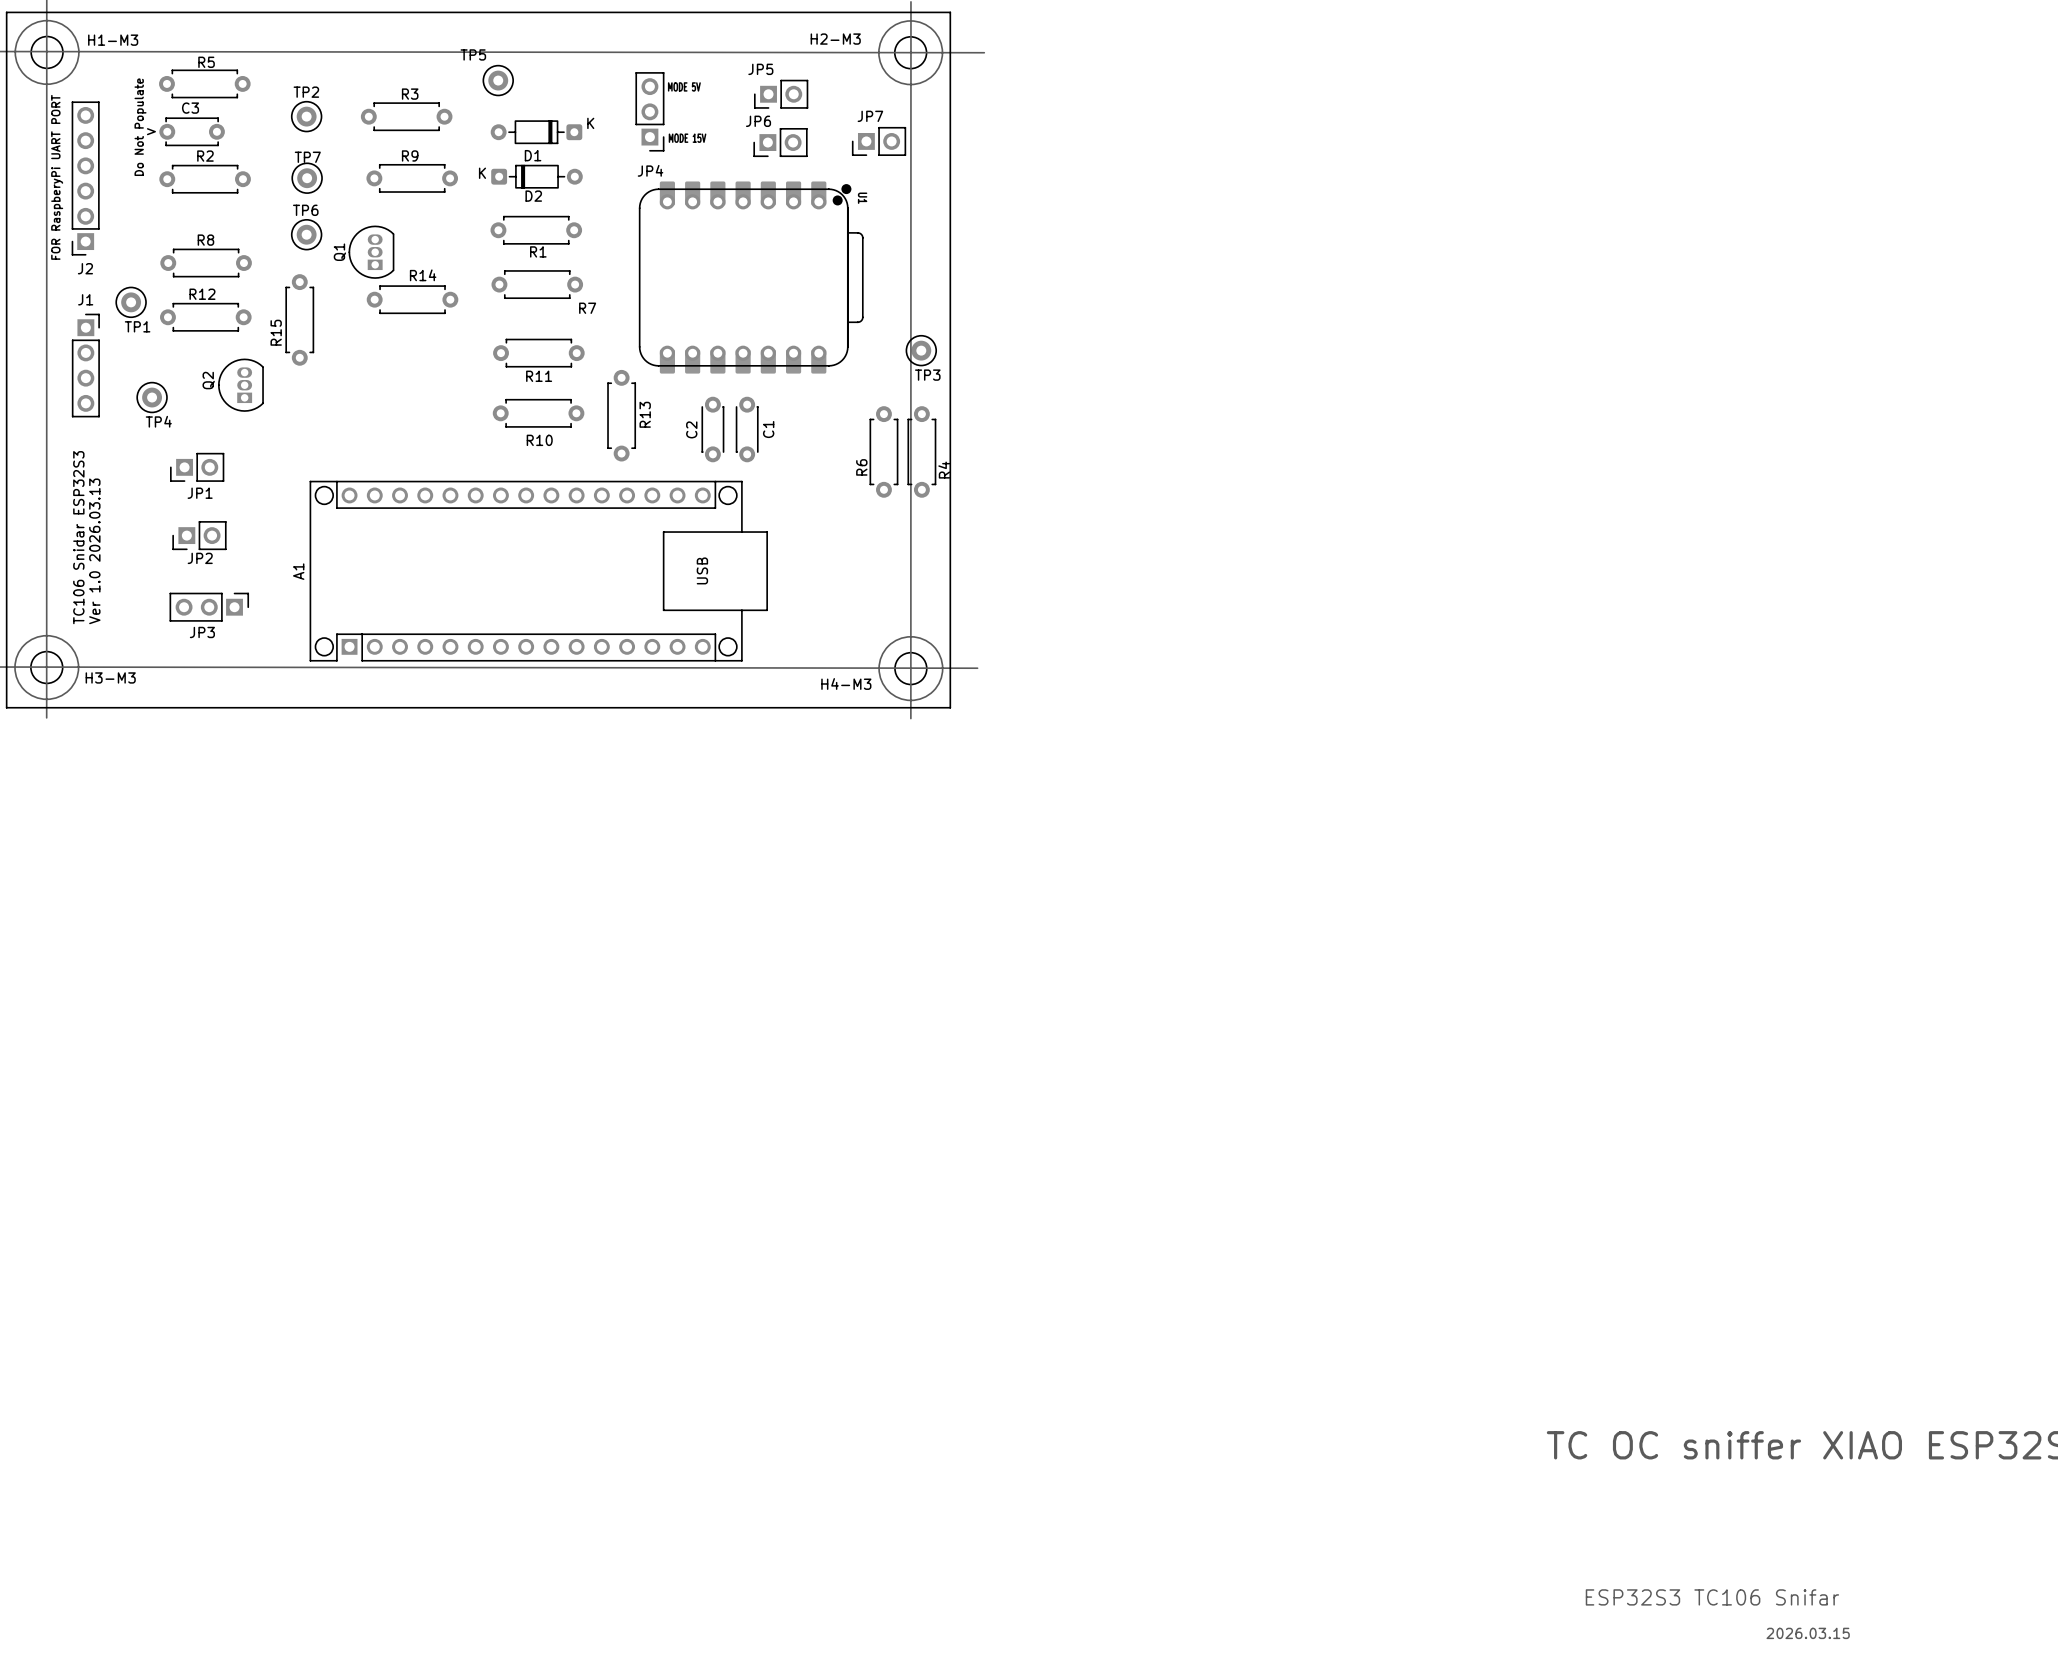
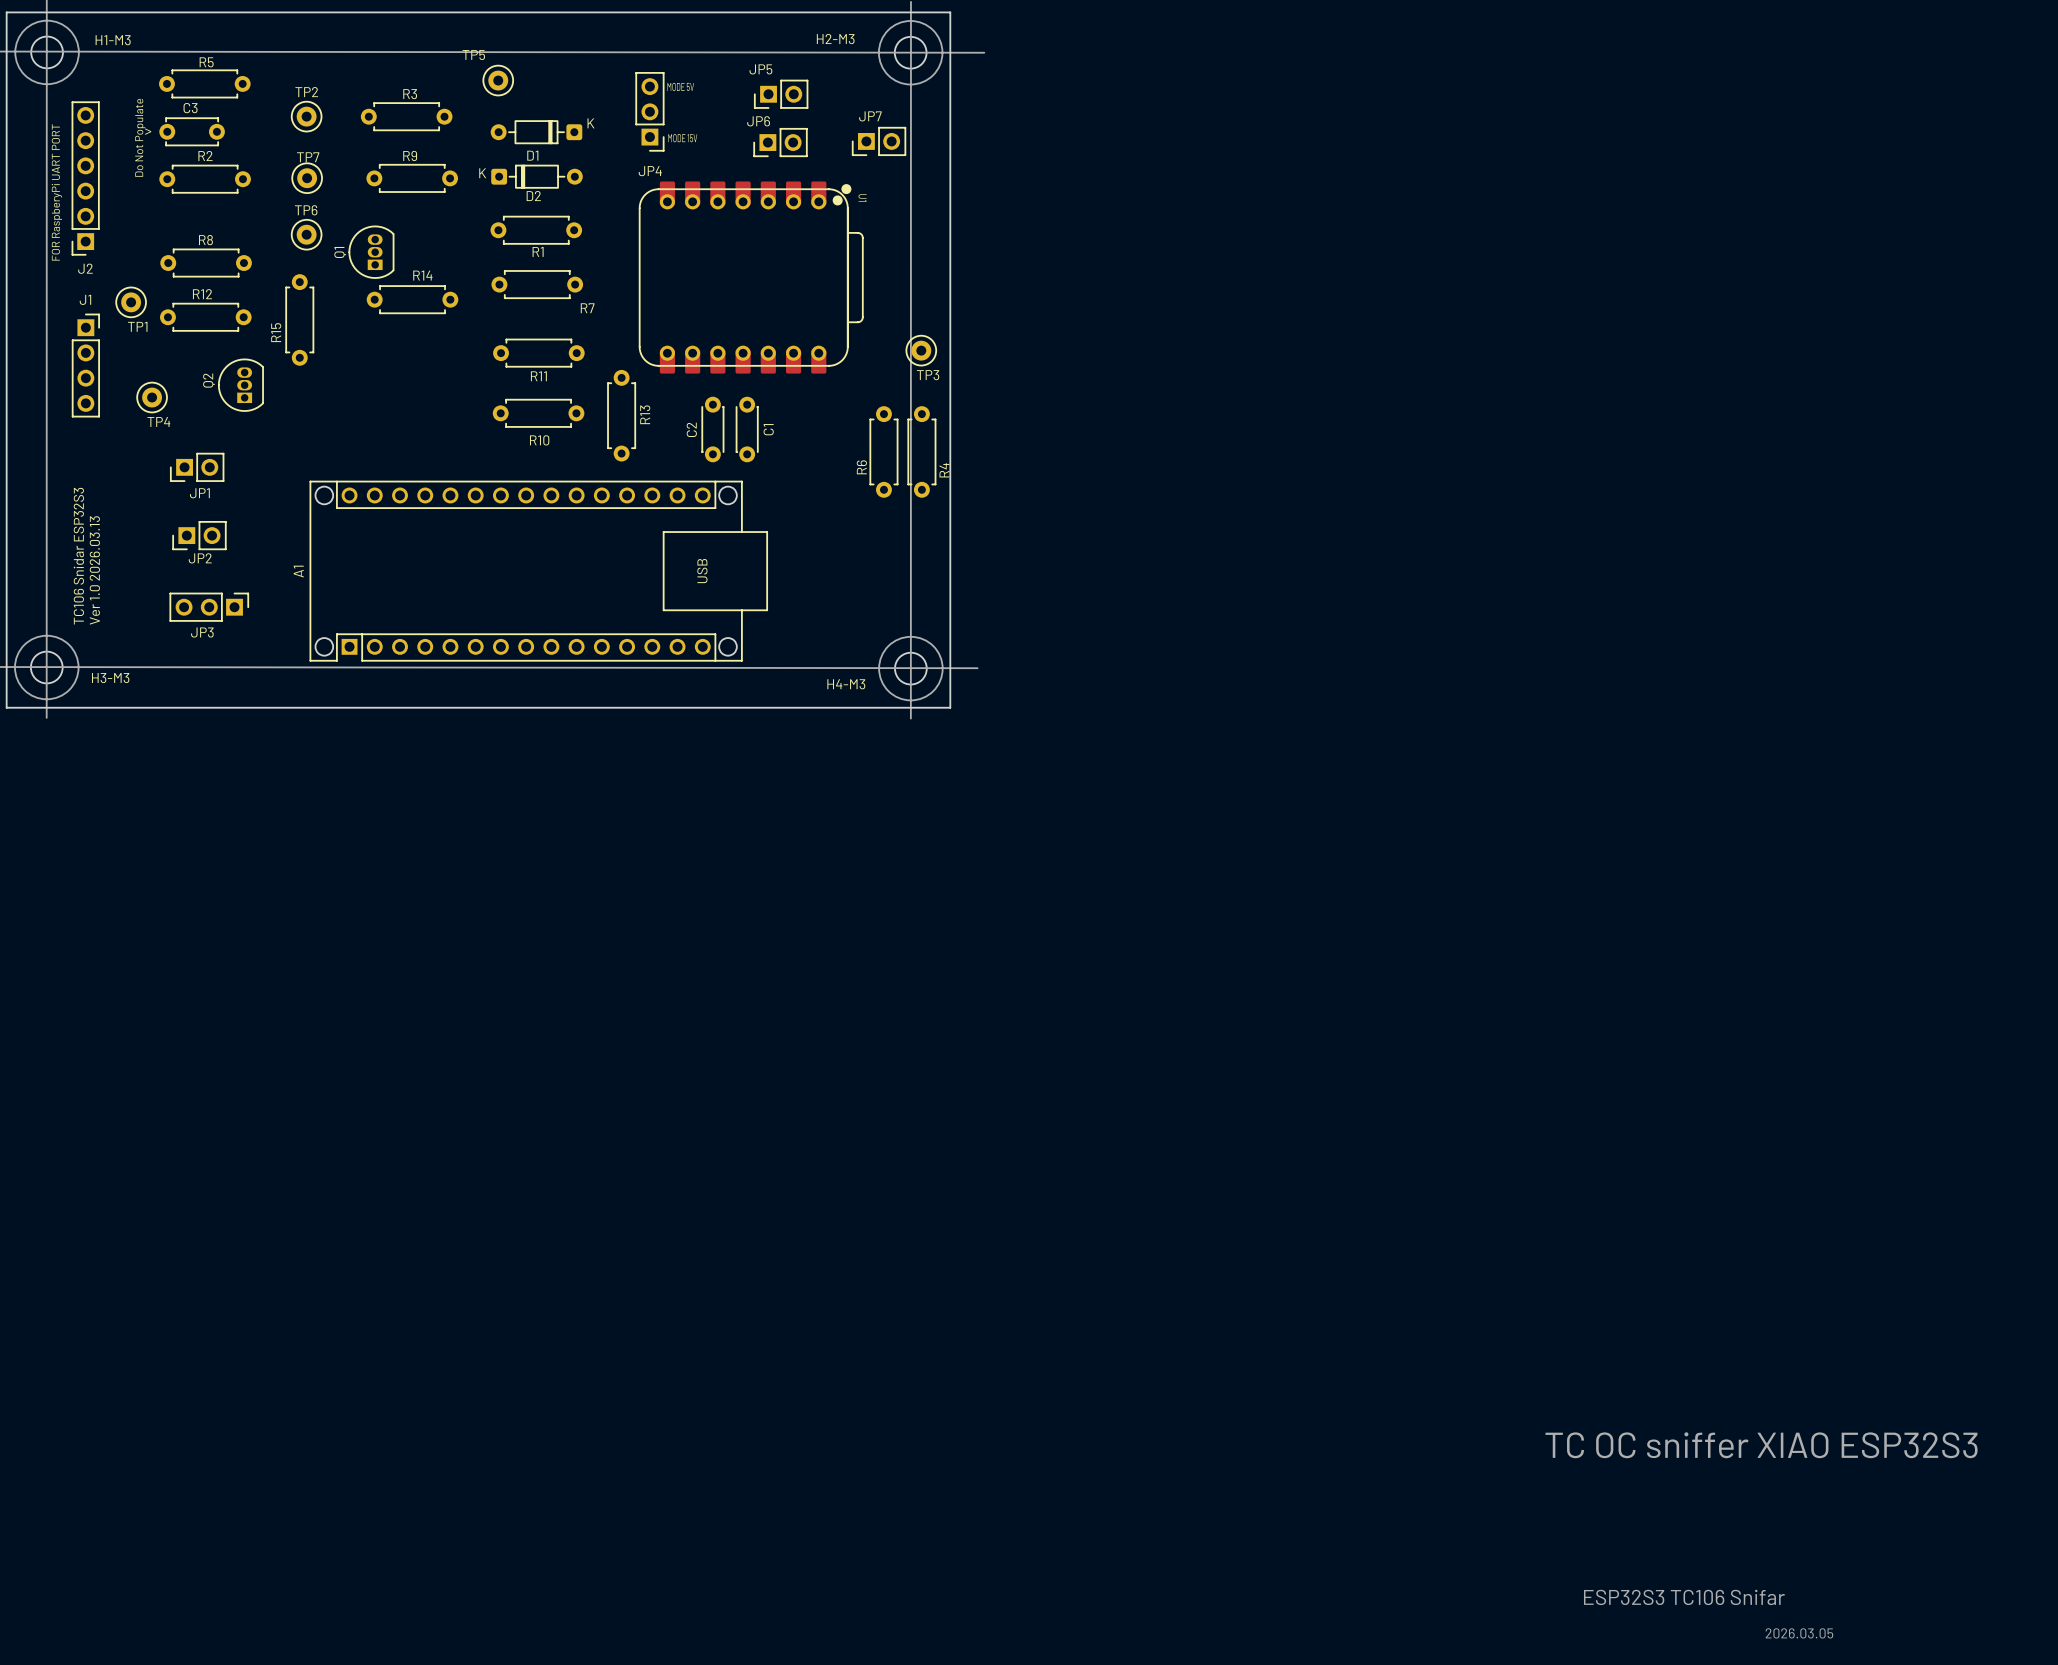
text: 2026.03.15 (1808, 1633) -> 2026.03.05 (1799, 1633)

